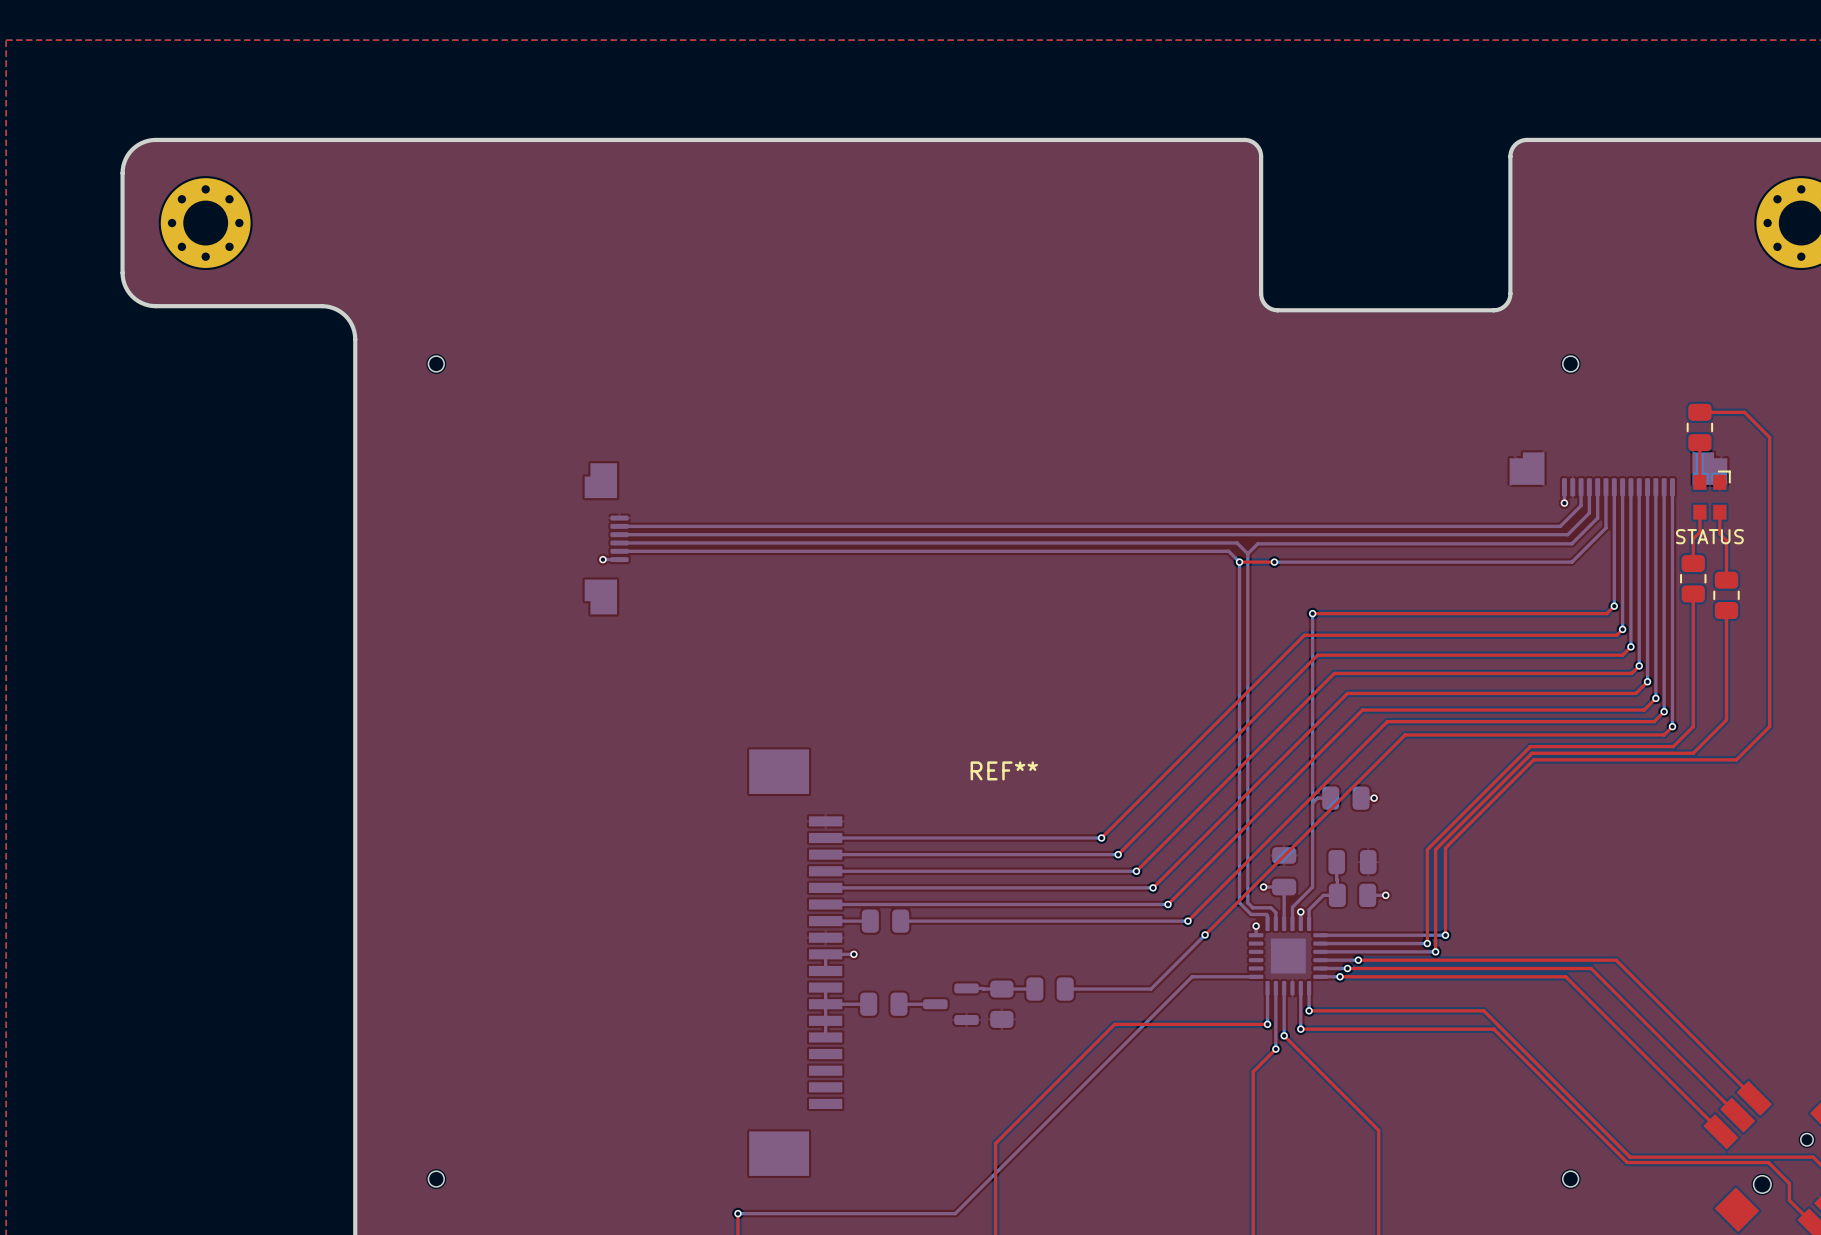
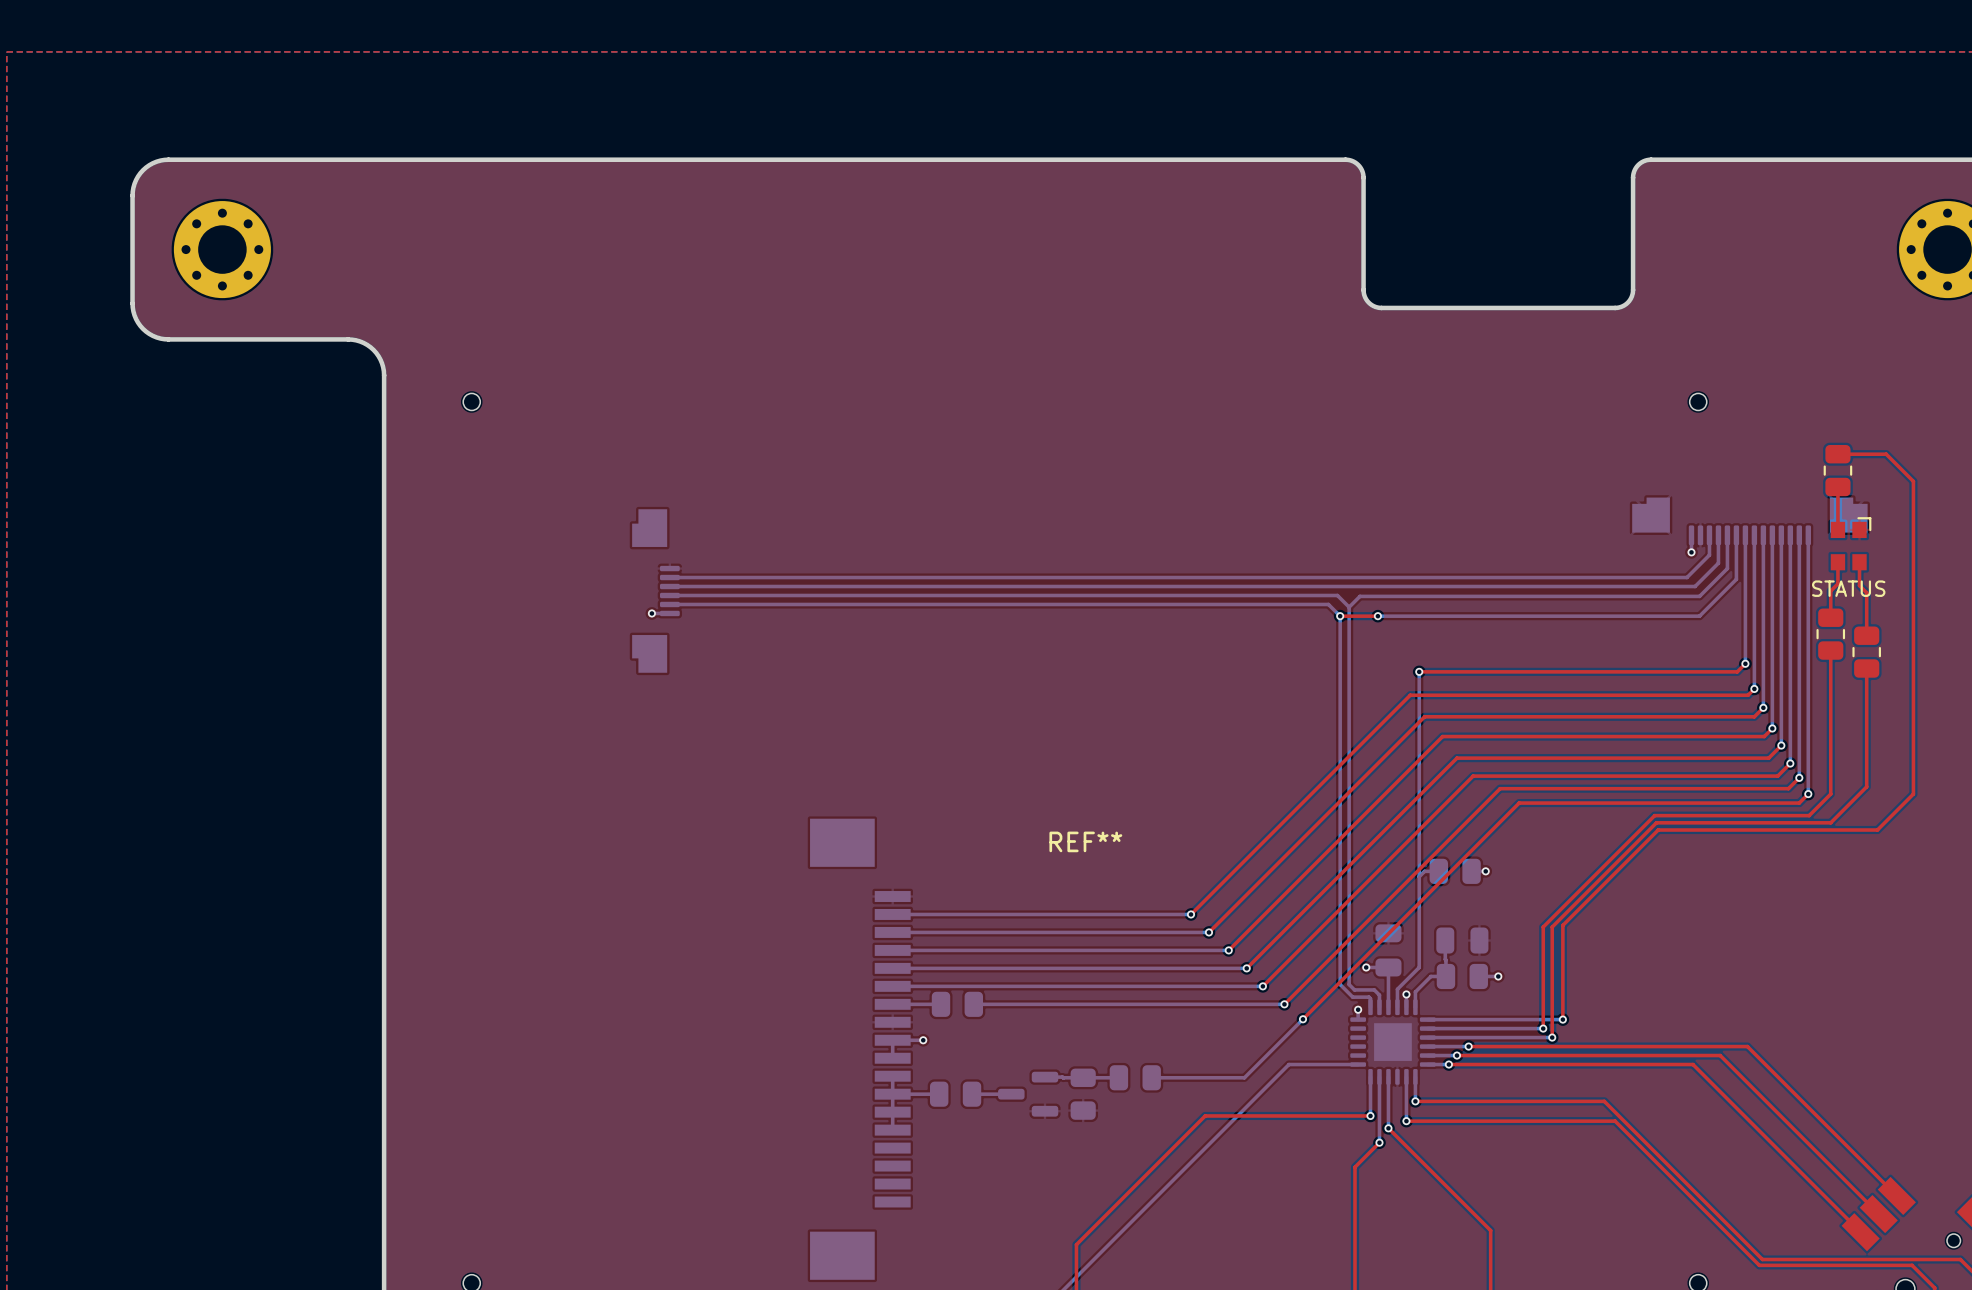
board edge: (1261, 260) (1262, 299) (1268, 307) (1277, 310) (1497, 309) (1505, 305) (1510, 297) (1510, 260) -> (1363, 290) (1368, 302) (1381, 307) (1617, 307) (1627, 302) (1633, 290)

